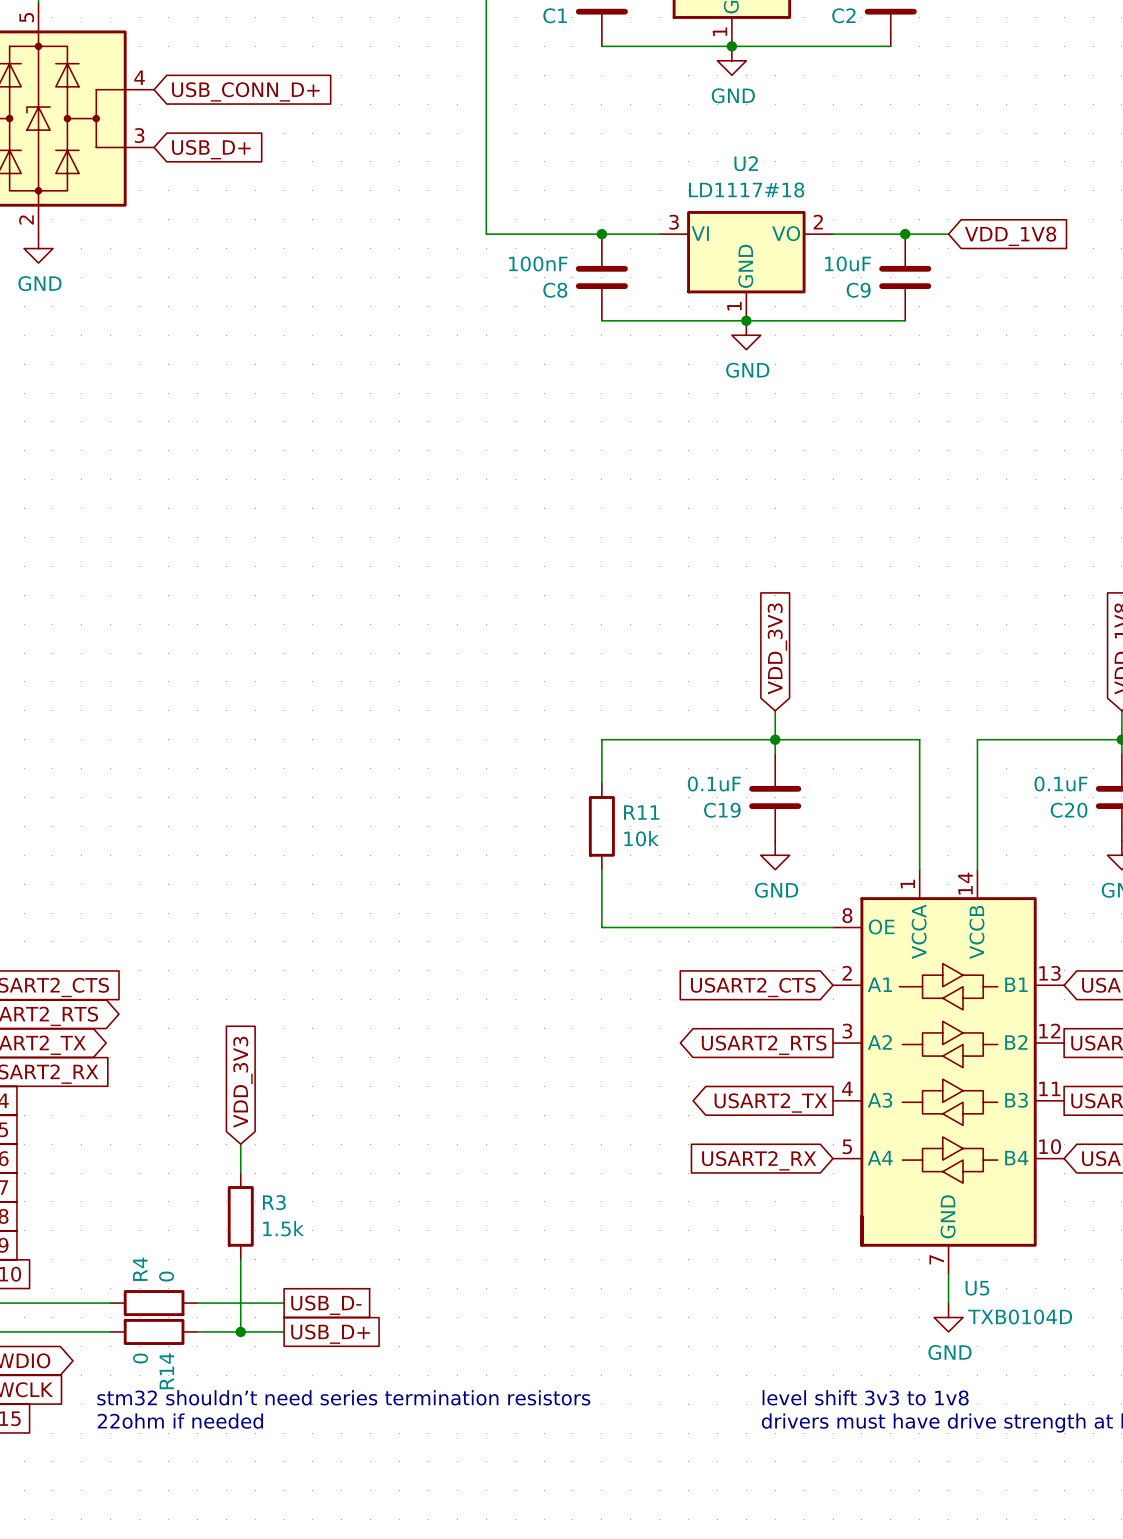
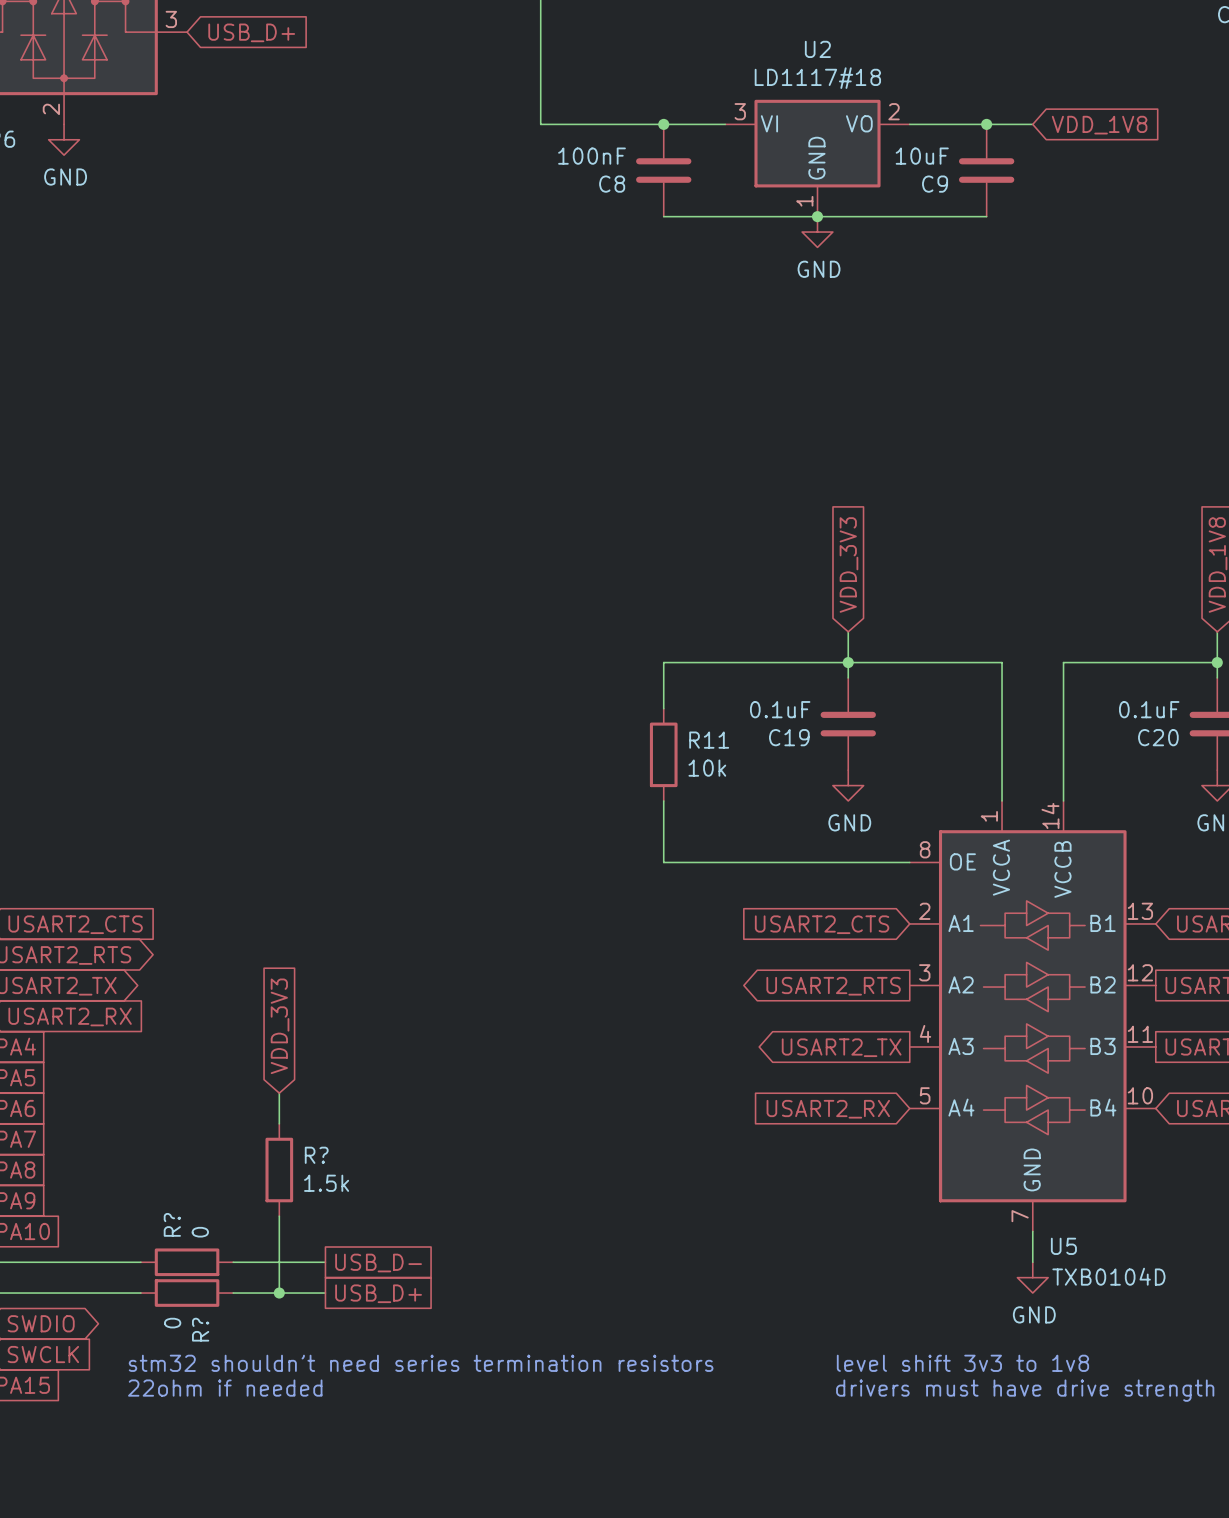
R3 name: R3 (274, 1202) -> R? (316, 1155)
R4 name: R4 (140, 1269) -> R? (172, 1224)
R14 name: R14 (166, 1371) -> R? (200, 1329)

